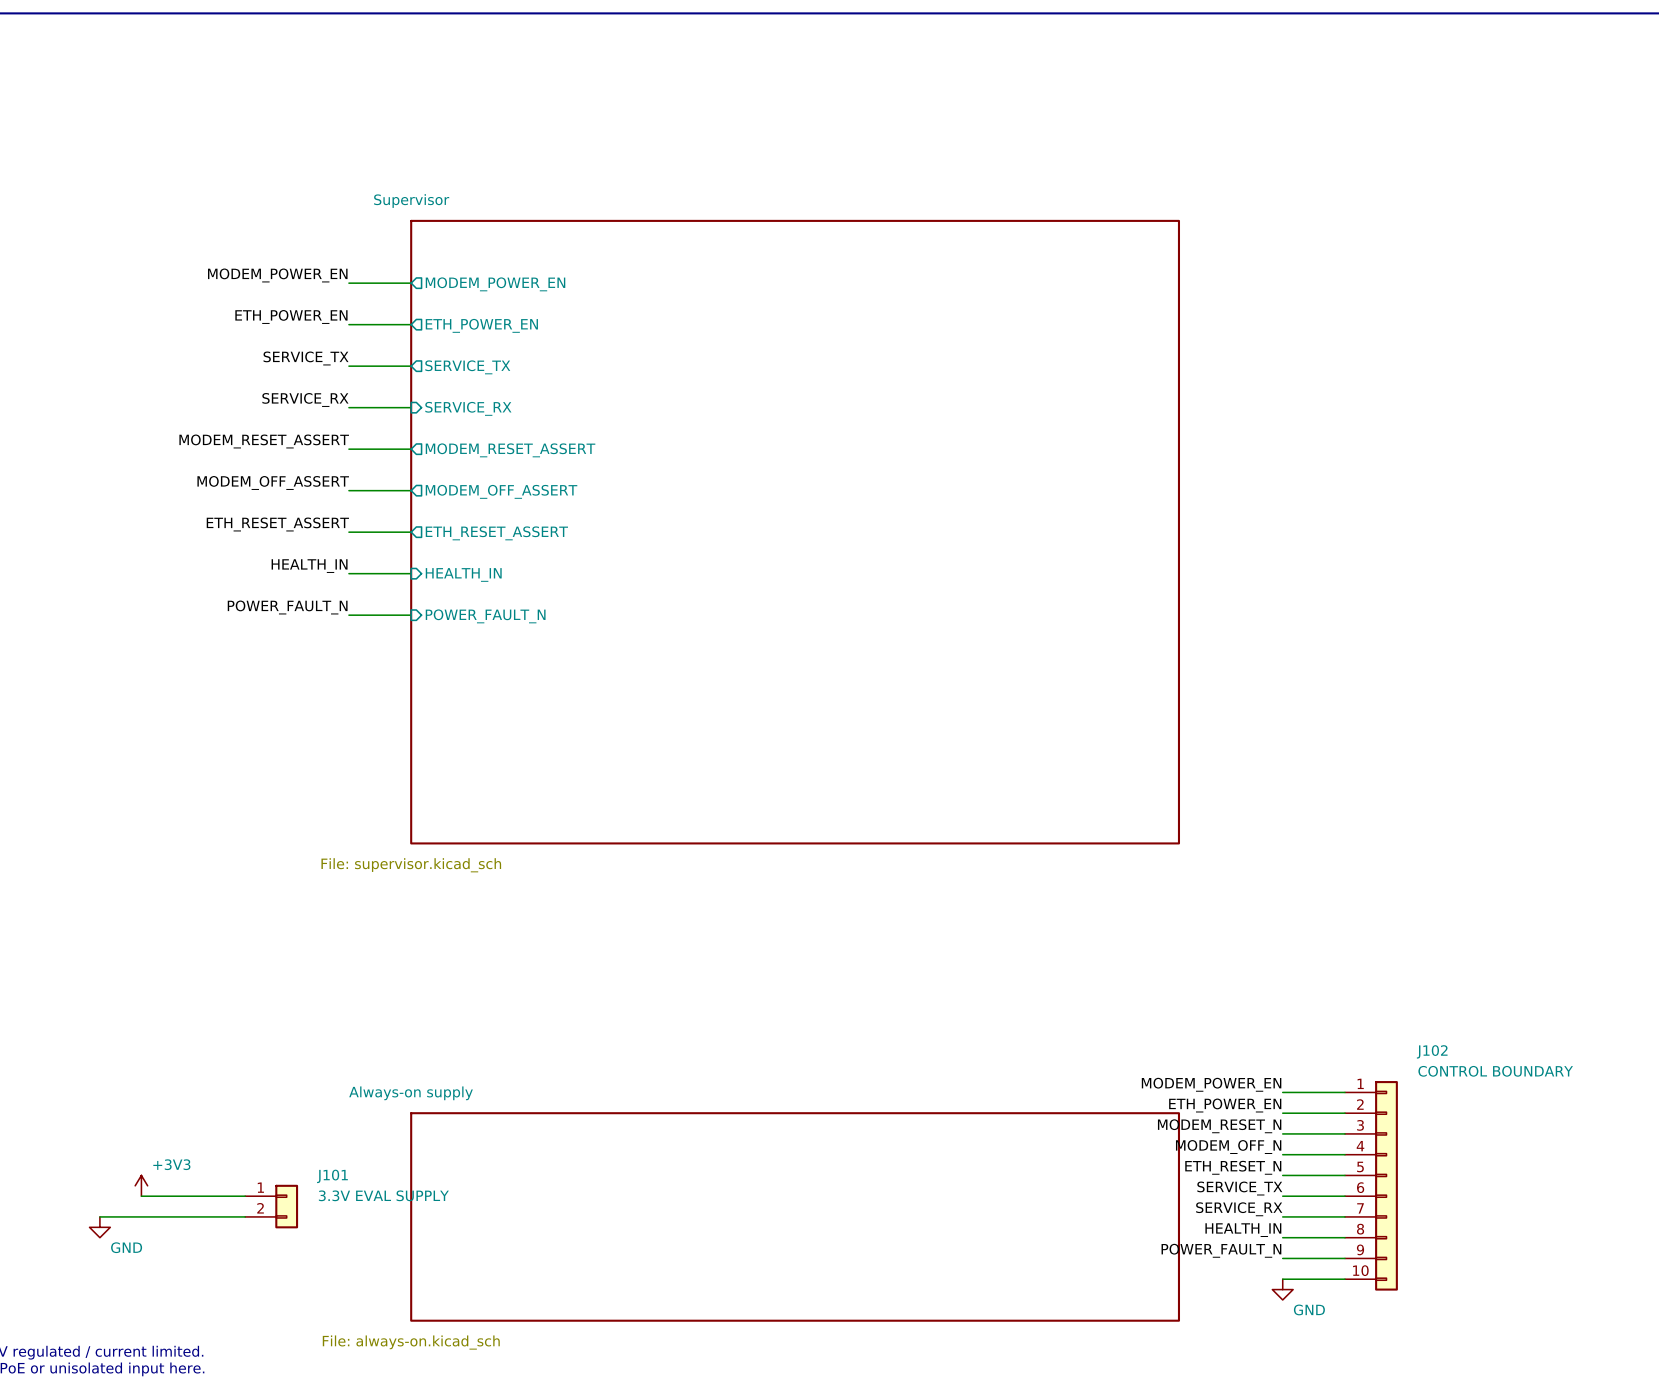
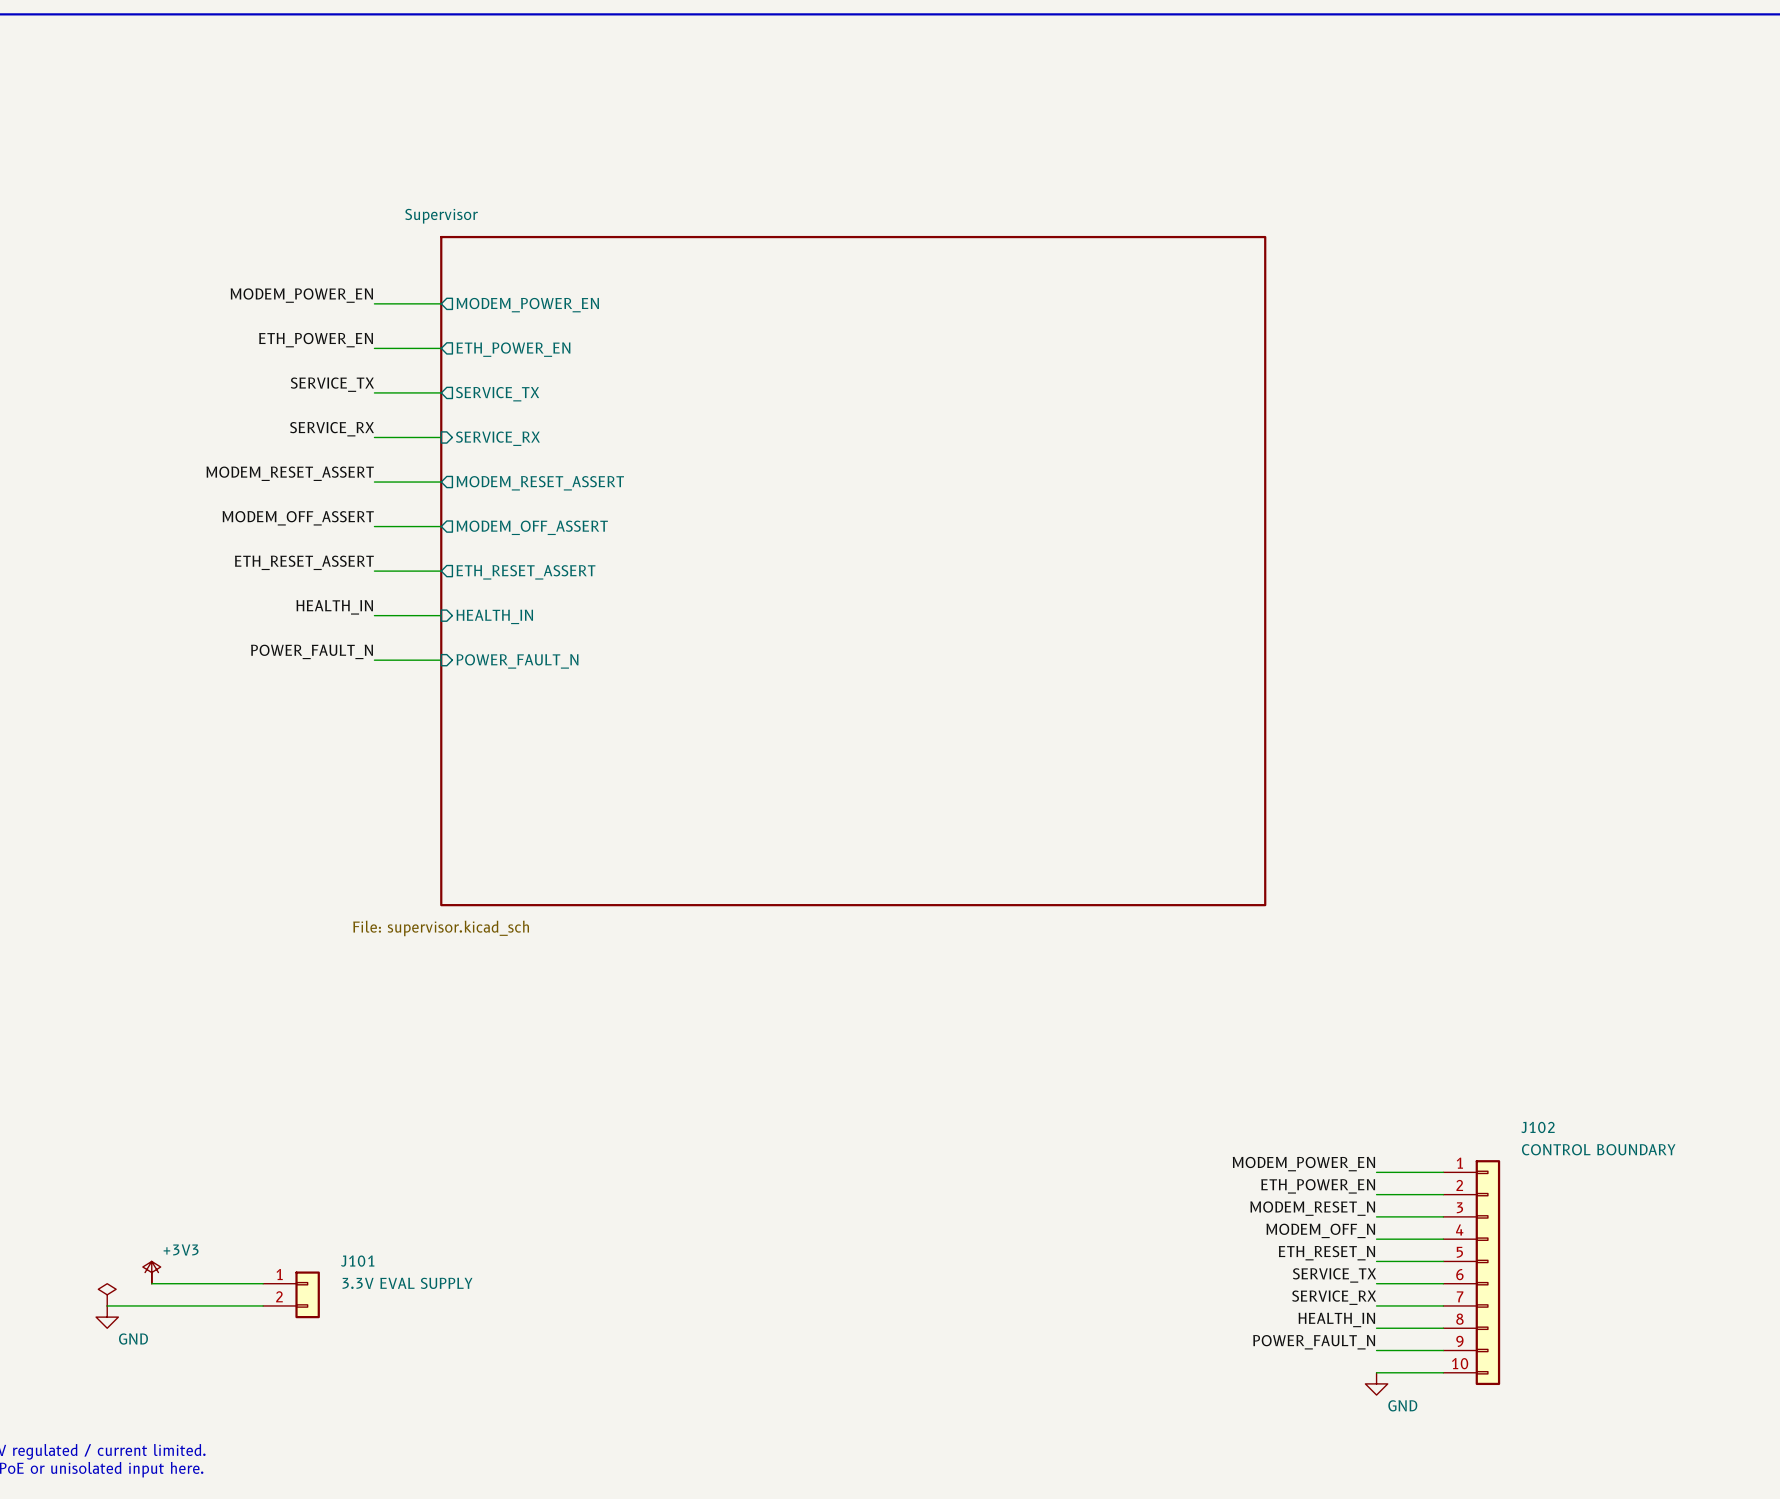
power symbol: none -> (151, 1272)
power symbol: none -> (107, 1294)
sheet Always-on supply: File: always-on.kicad_sch (795, 1216) -> none

